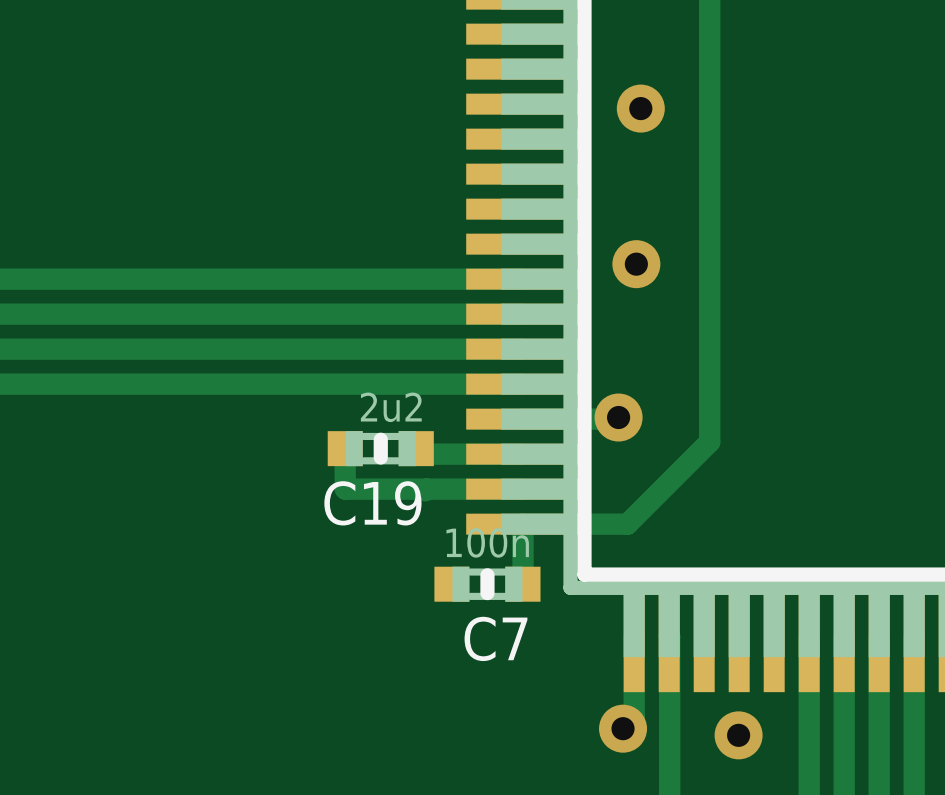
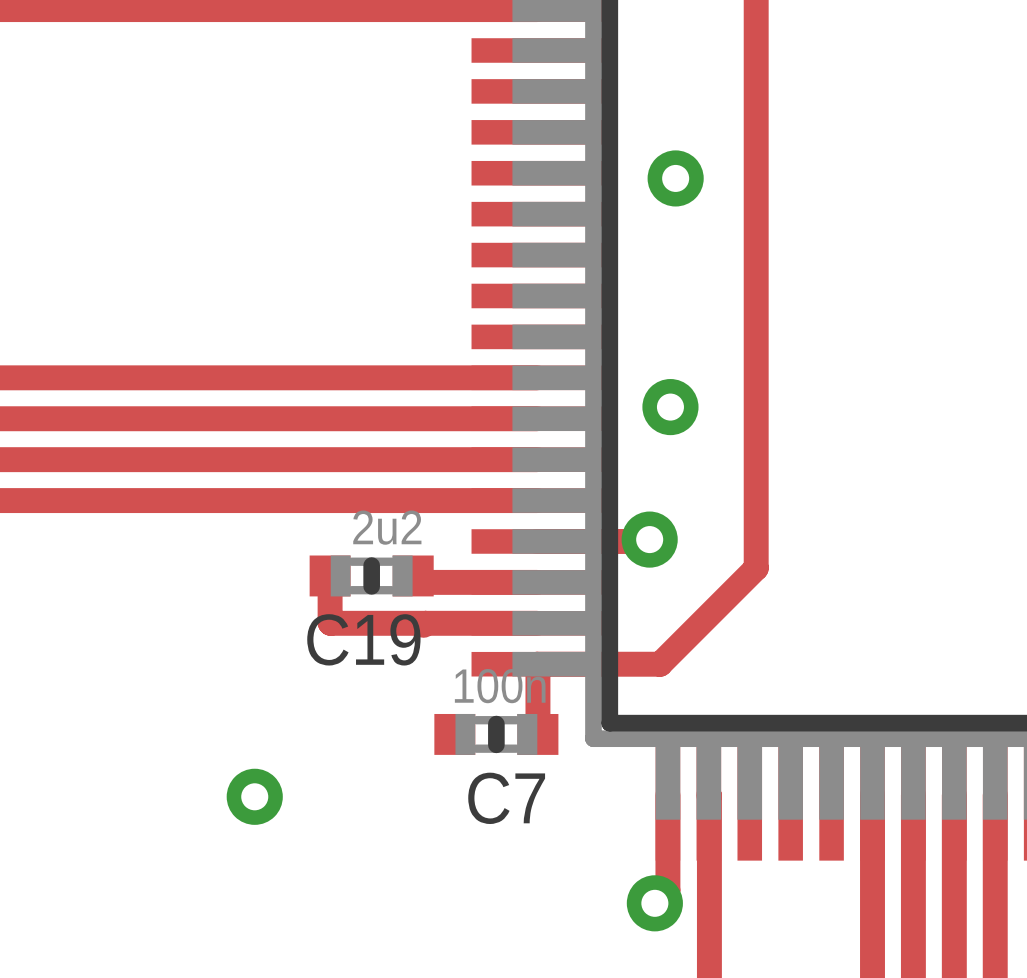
via position: (636, 264) -> (670, 407)
via: none -> (254, 796)
via: (738, 735) -> none

